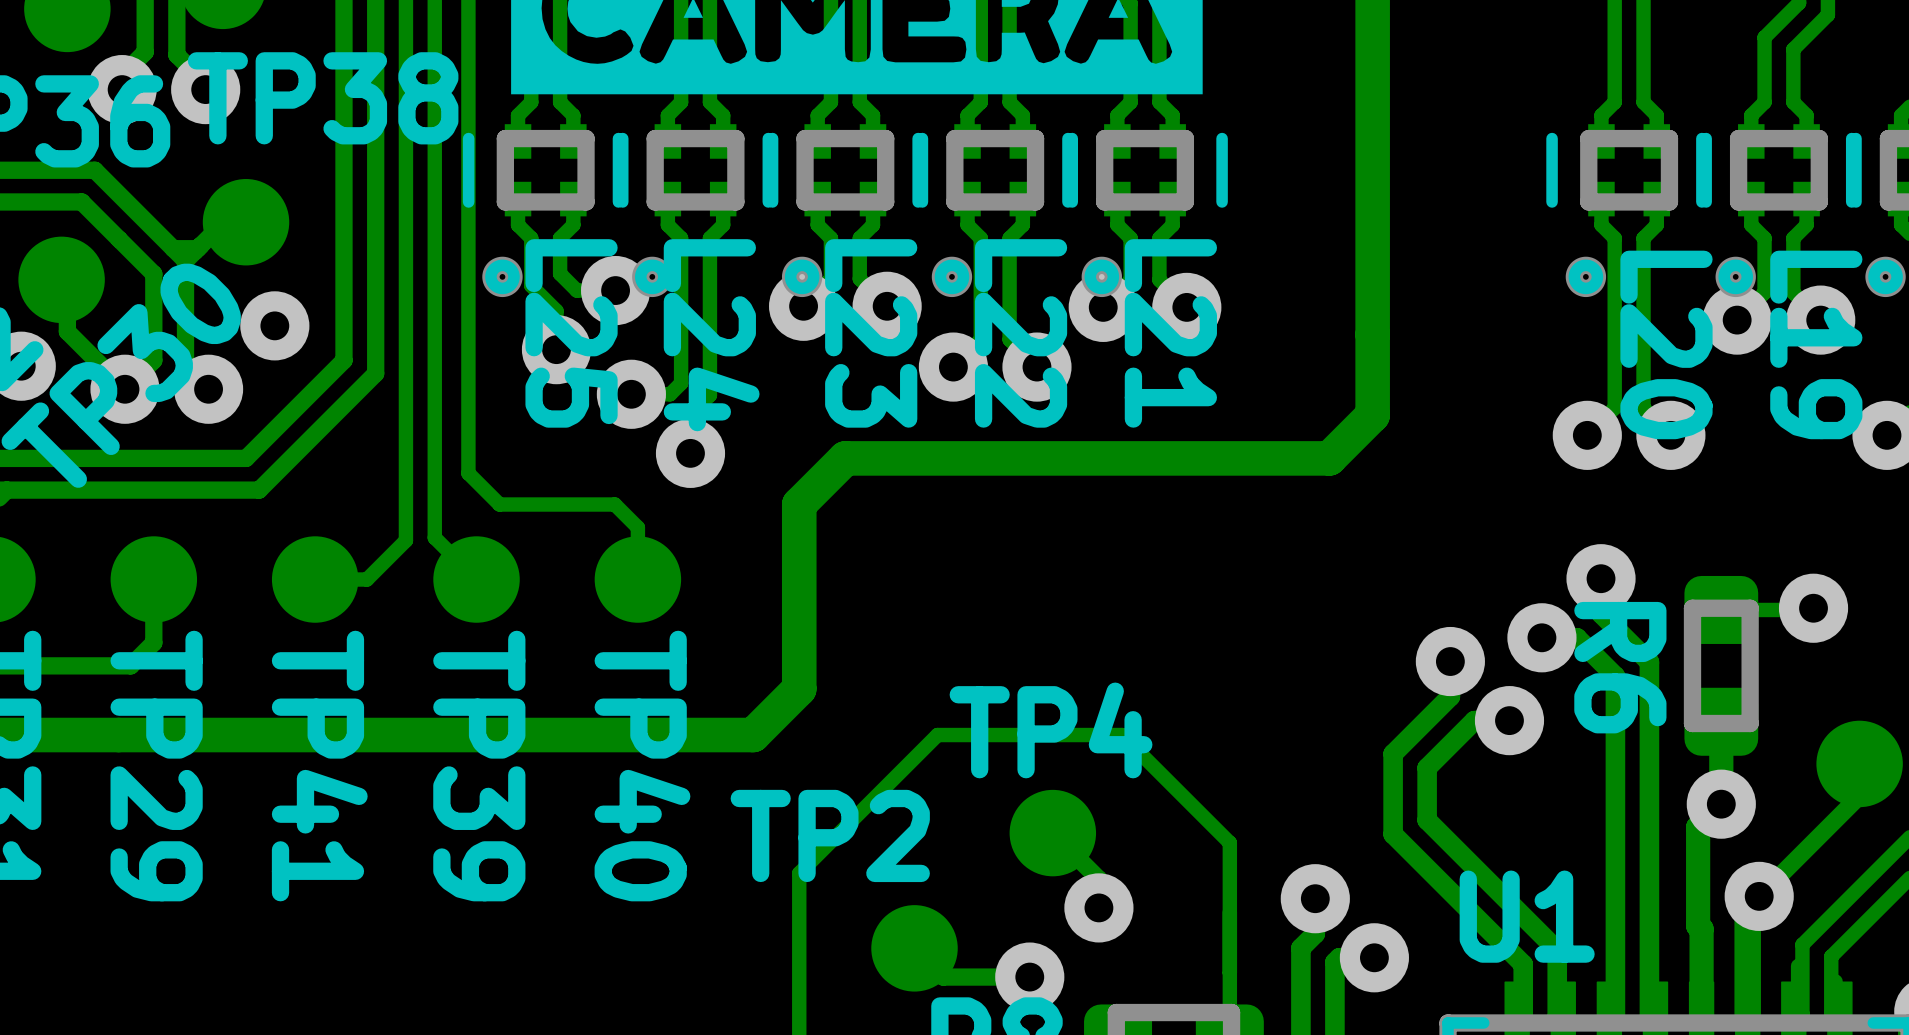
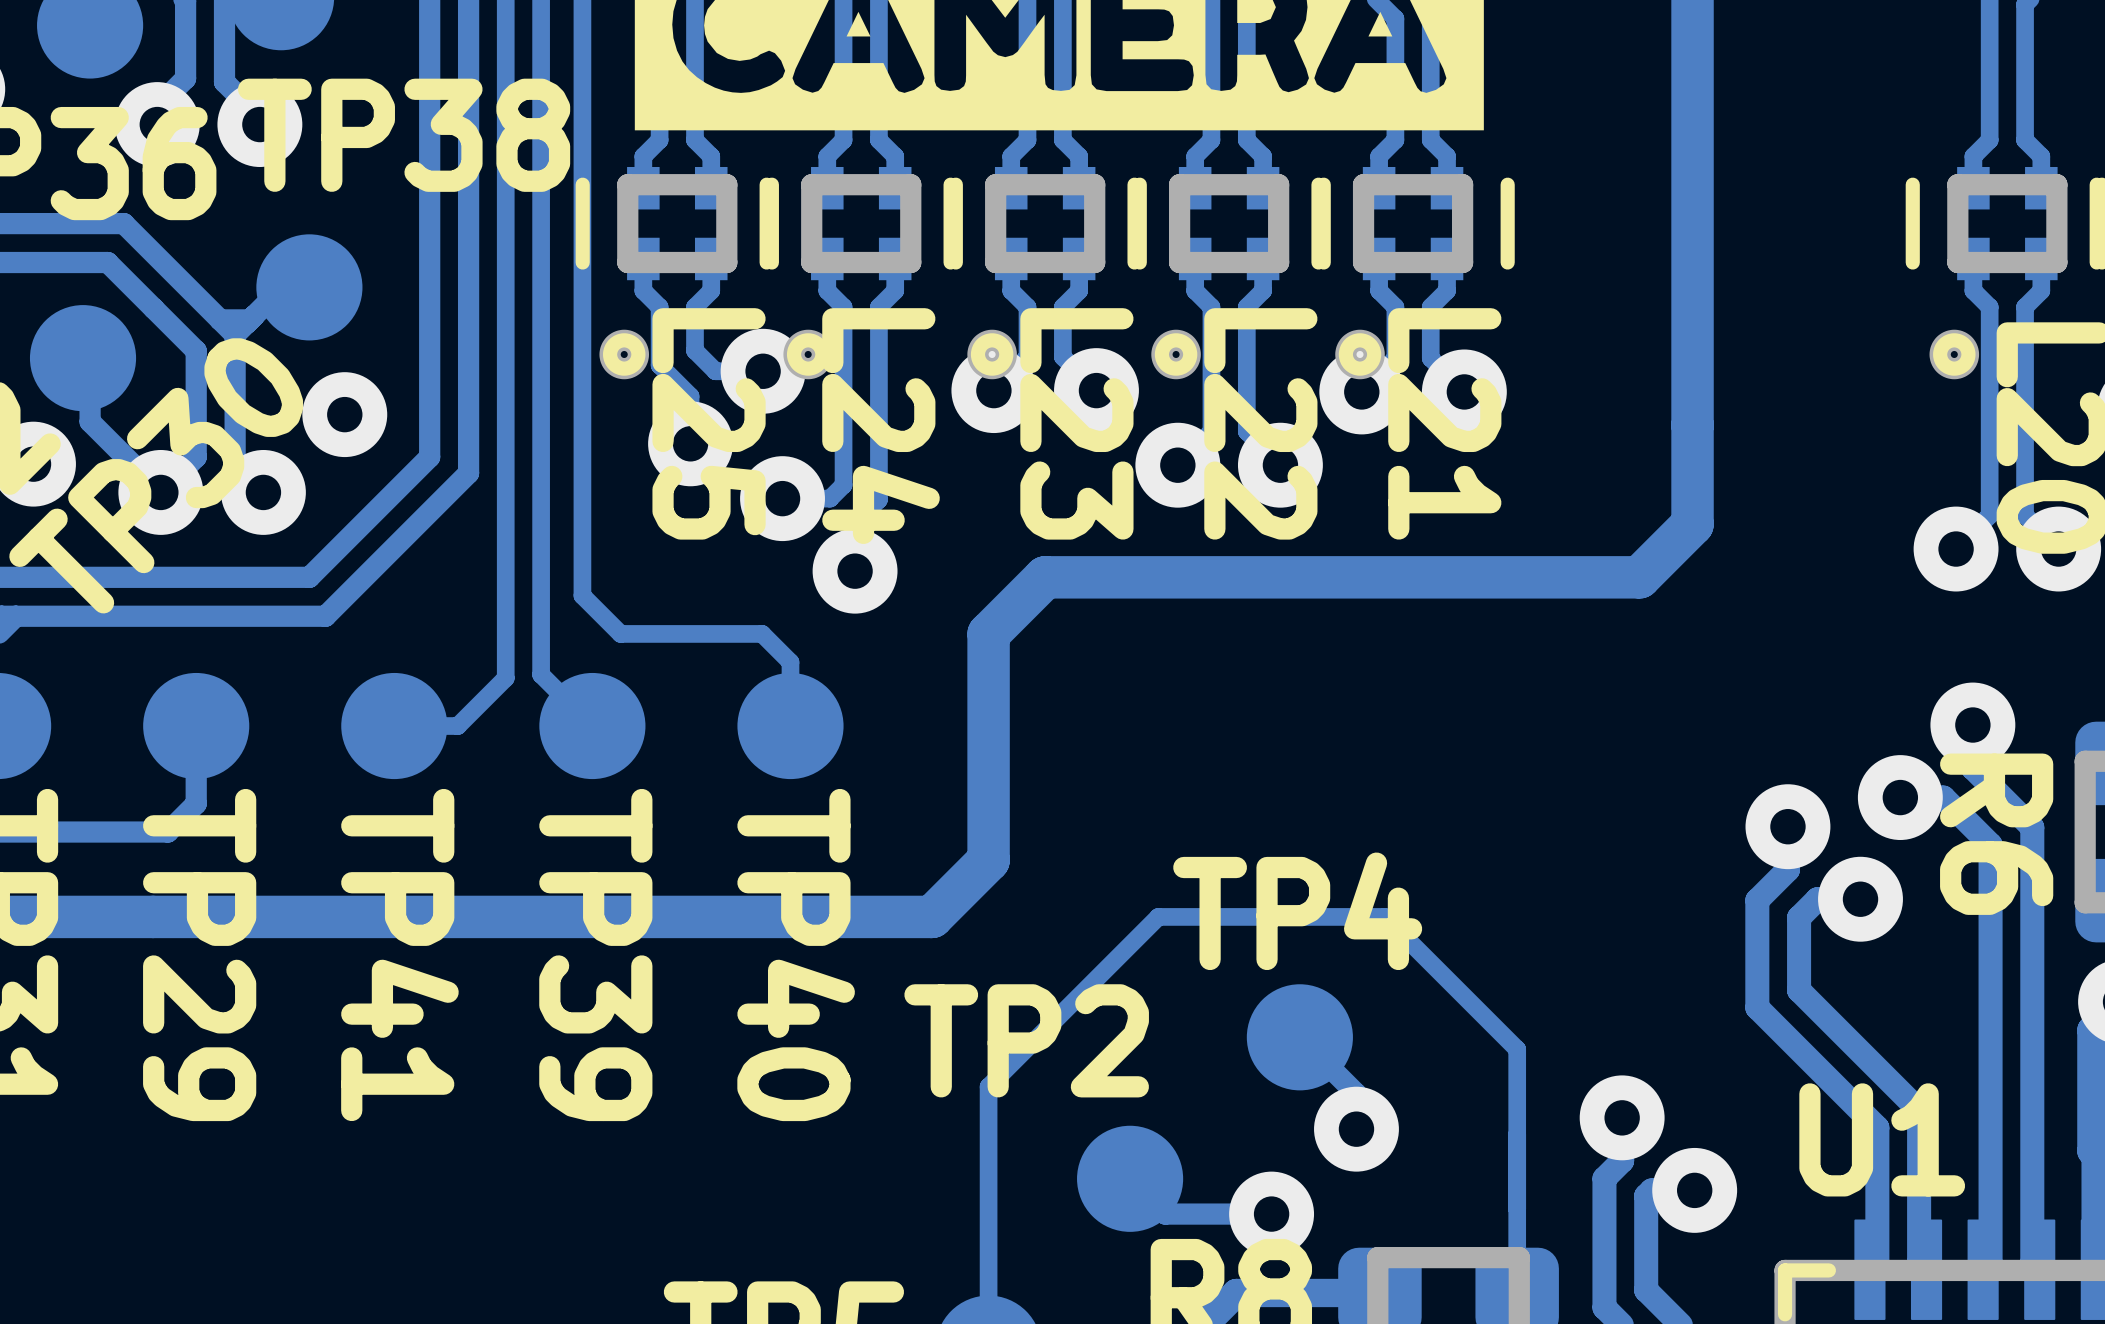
track: (1425, 721) (1393, 753) (1393, 834) (1523, 964) -> (1757, 900) (1757, 1007) (1877, 1127) (1877, 1198)
track: (1459, 735) (1427, 767) (1427, 820) (1557, 950) -> (1799, 917) (1799, 990) (1919, 1110) (1919, 1181)

